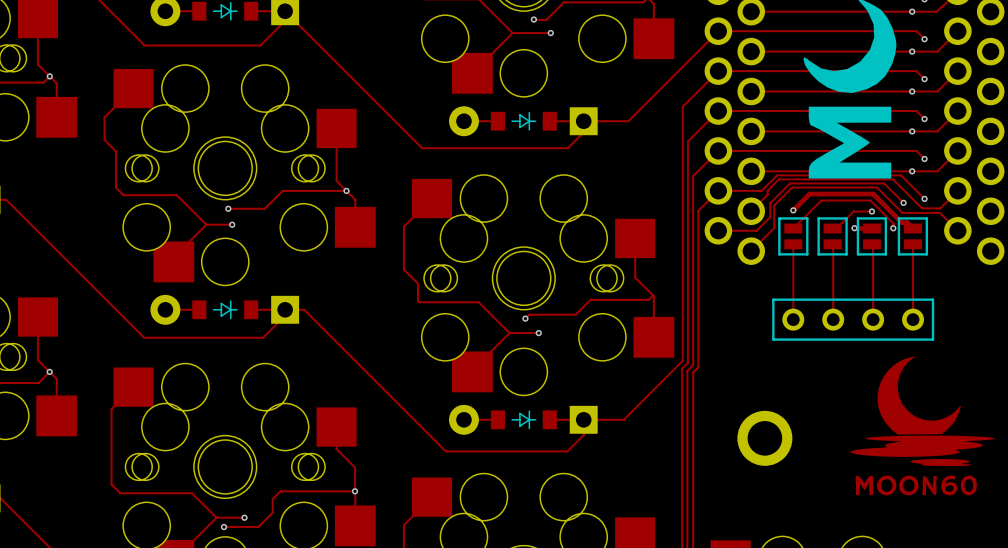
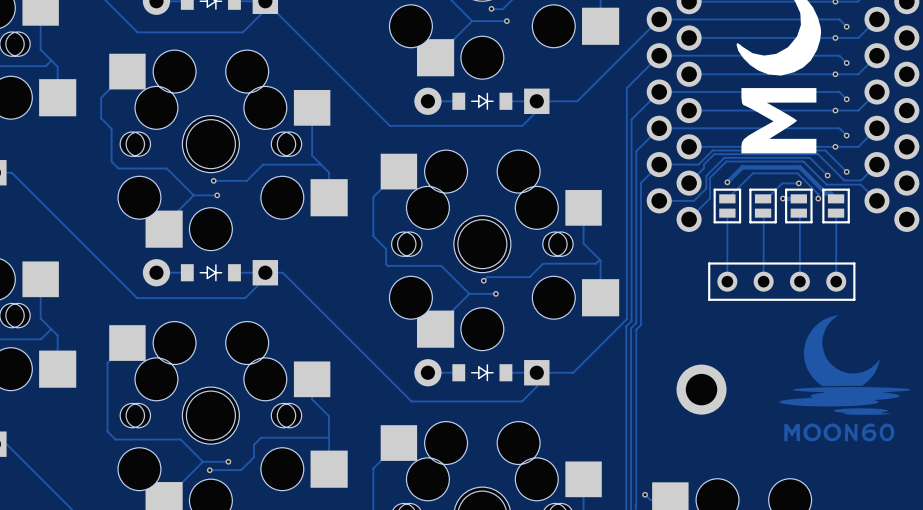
via: (49, 76) -> none
via: (346, 190) -> none
via: (49, 371) -> none
via: (355, 491) -> none

